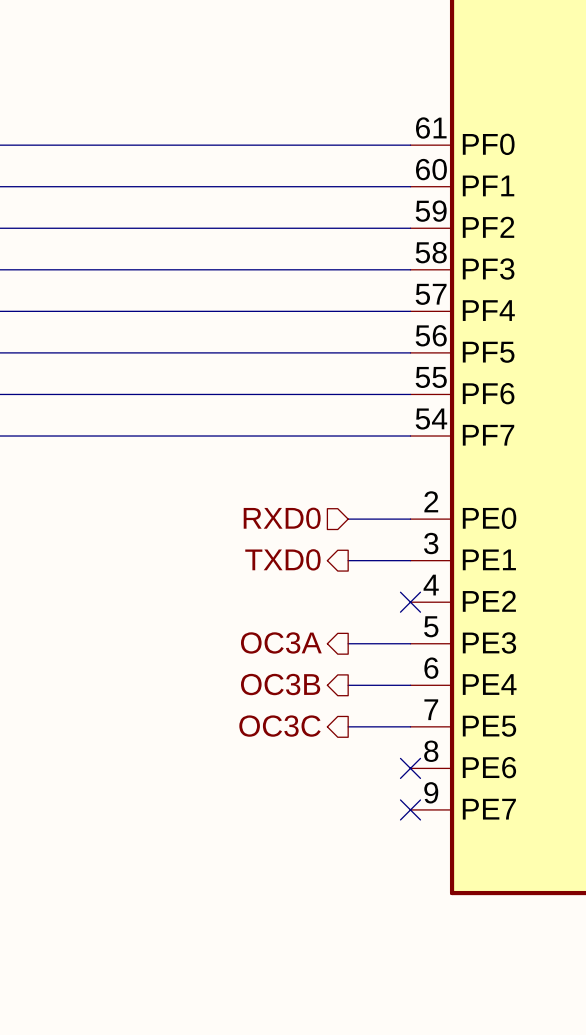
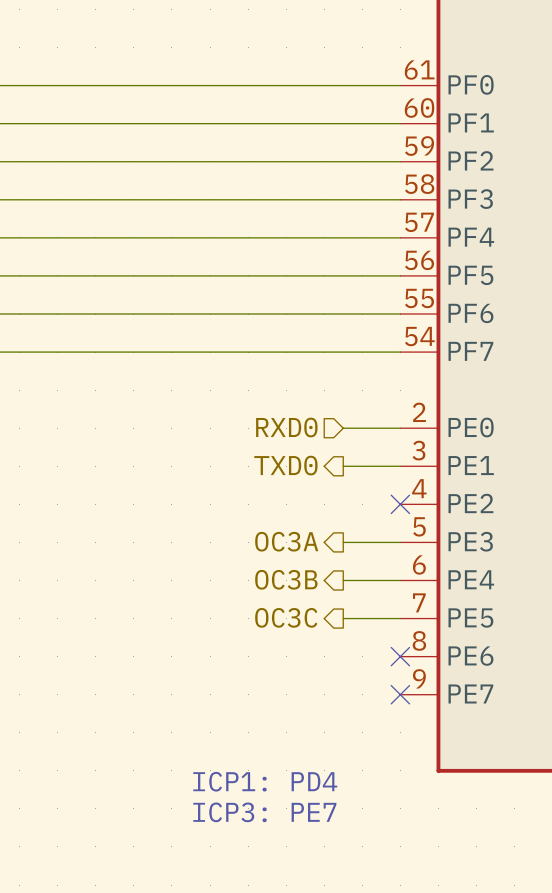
text: none -> ICP1: PD4 (265, 781)
text: none -> ICP3: PE7 (264, 812)

